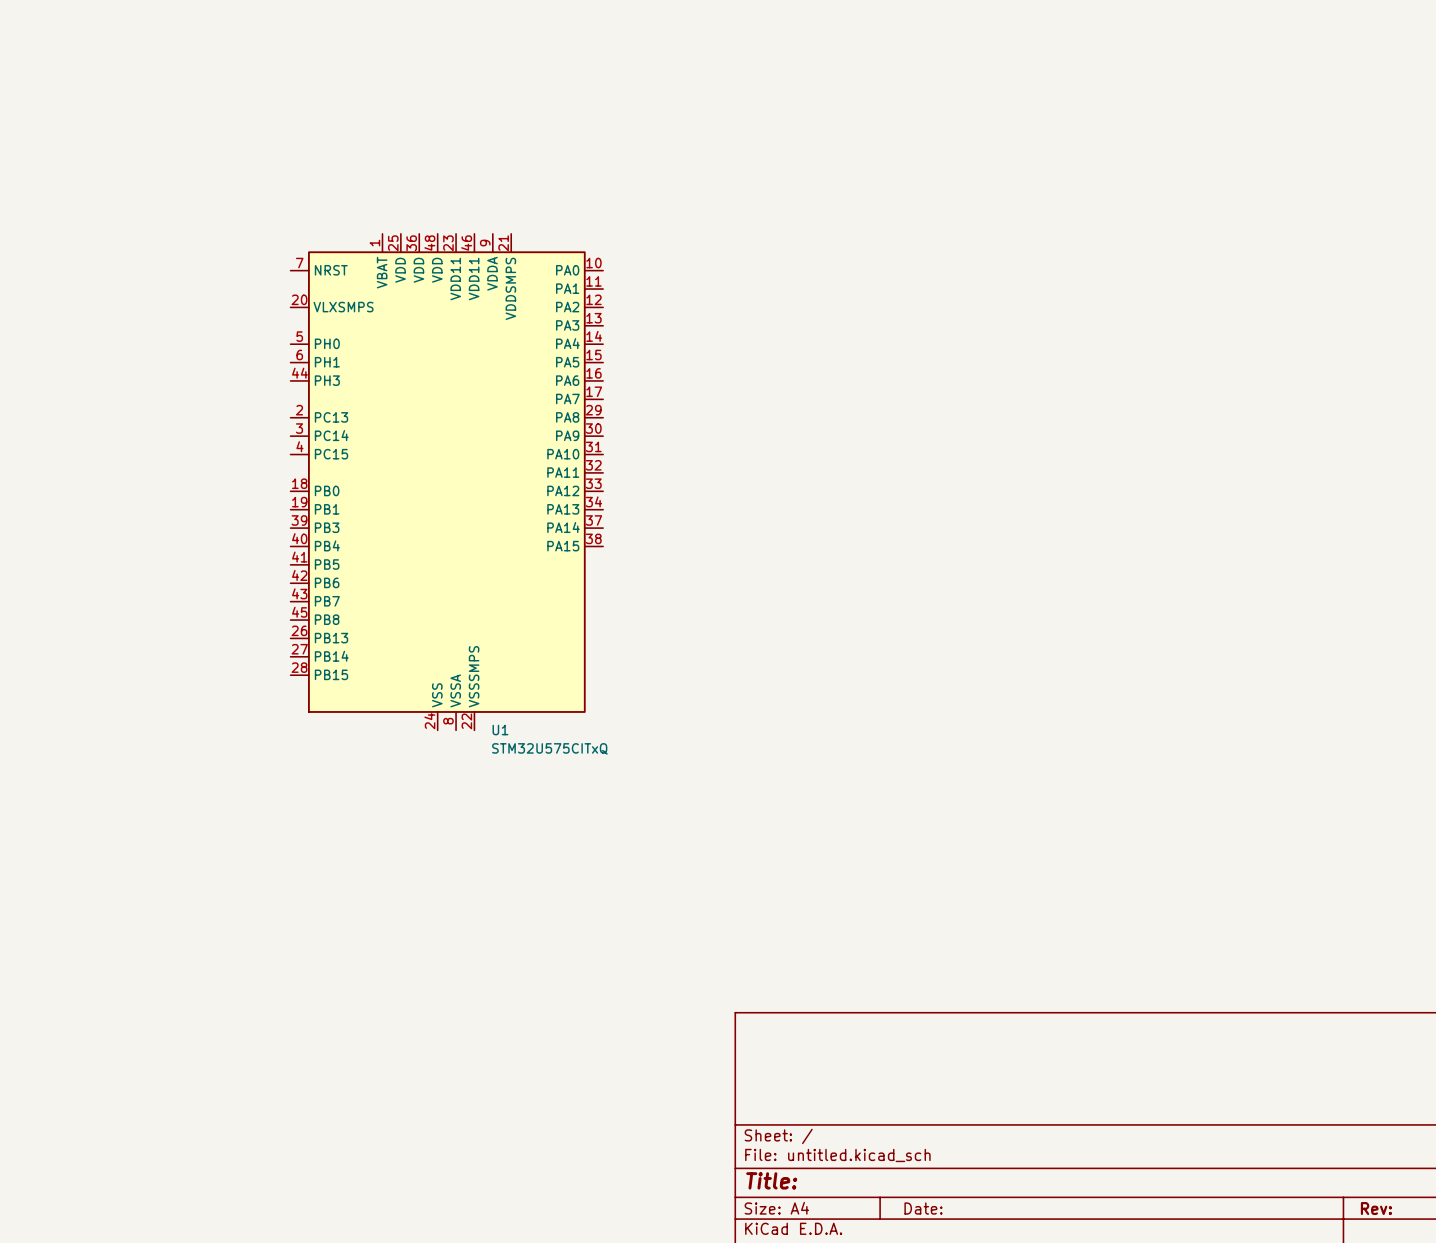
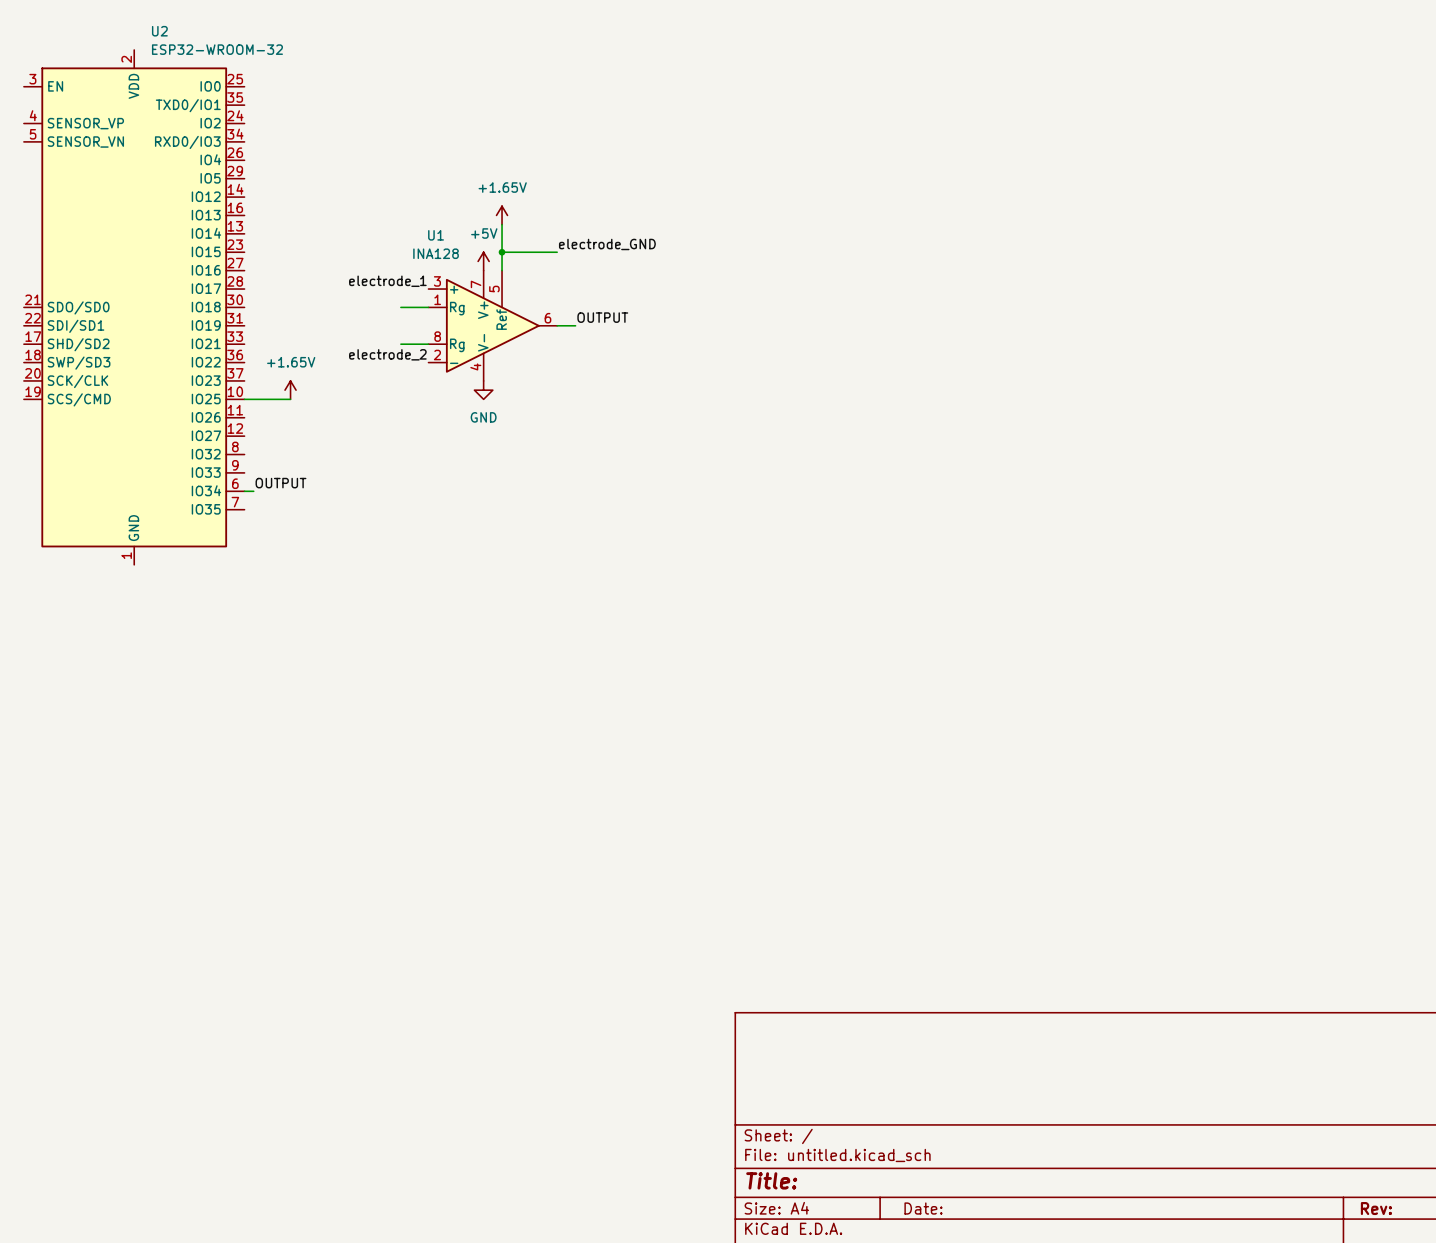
power symbol: none -> +1.65V (502, 215)
wire: none -> (502, 224) (502, 270)
U1 symbol: [290, 233, 604, 731] -> [428, 270, 558, 381]
label: none -> electrode_GND (607, 244)
junction: none -> (502, 252)
power symbol: none -> +5V (483, 261)
label: none -> electrode_1 (387, 281)
U2: none -> ESP32-WROOM-32 (134, 307)
label: none -> OUTPUT (602, 317)
label: none -> electrode_2 (387, 354)
power symbol: none -> +1.65V (290, 390)
power symbol: none -> GND (483, 390)
wire: none -> (244, 399) (290, 399)
label: none -> OUTPUT (280, 483)
wire: none -> (244, 491) (253, 491)
U1 name position: U1 (500, 730) -> U1 (436, 235)
U1 value: STM32U575CITxQ (549, 748) -> INA128 (436, 253)

